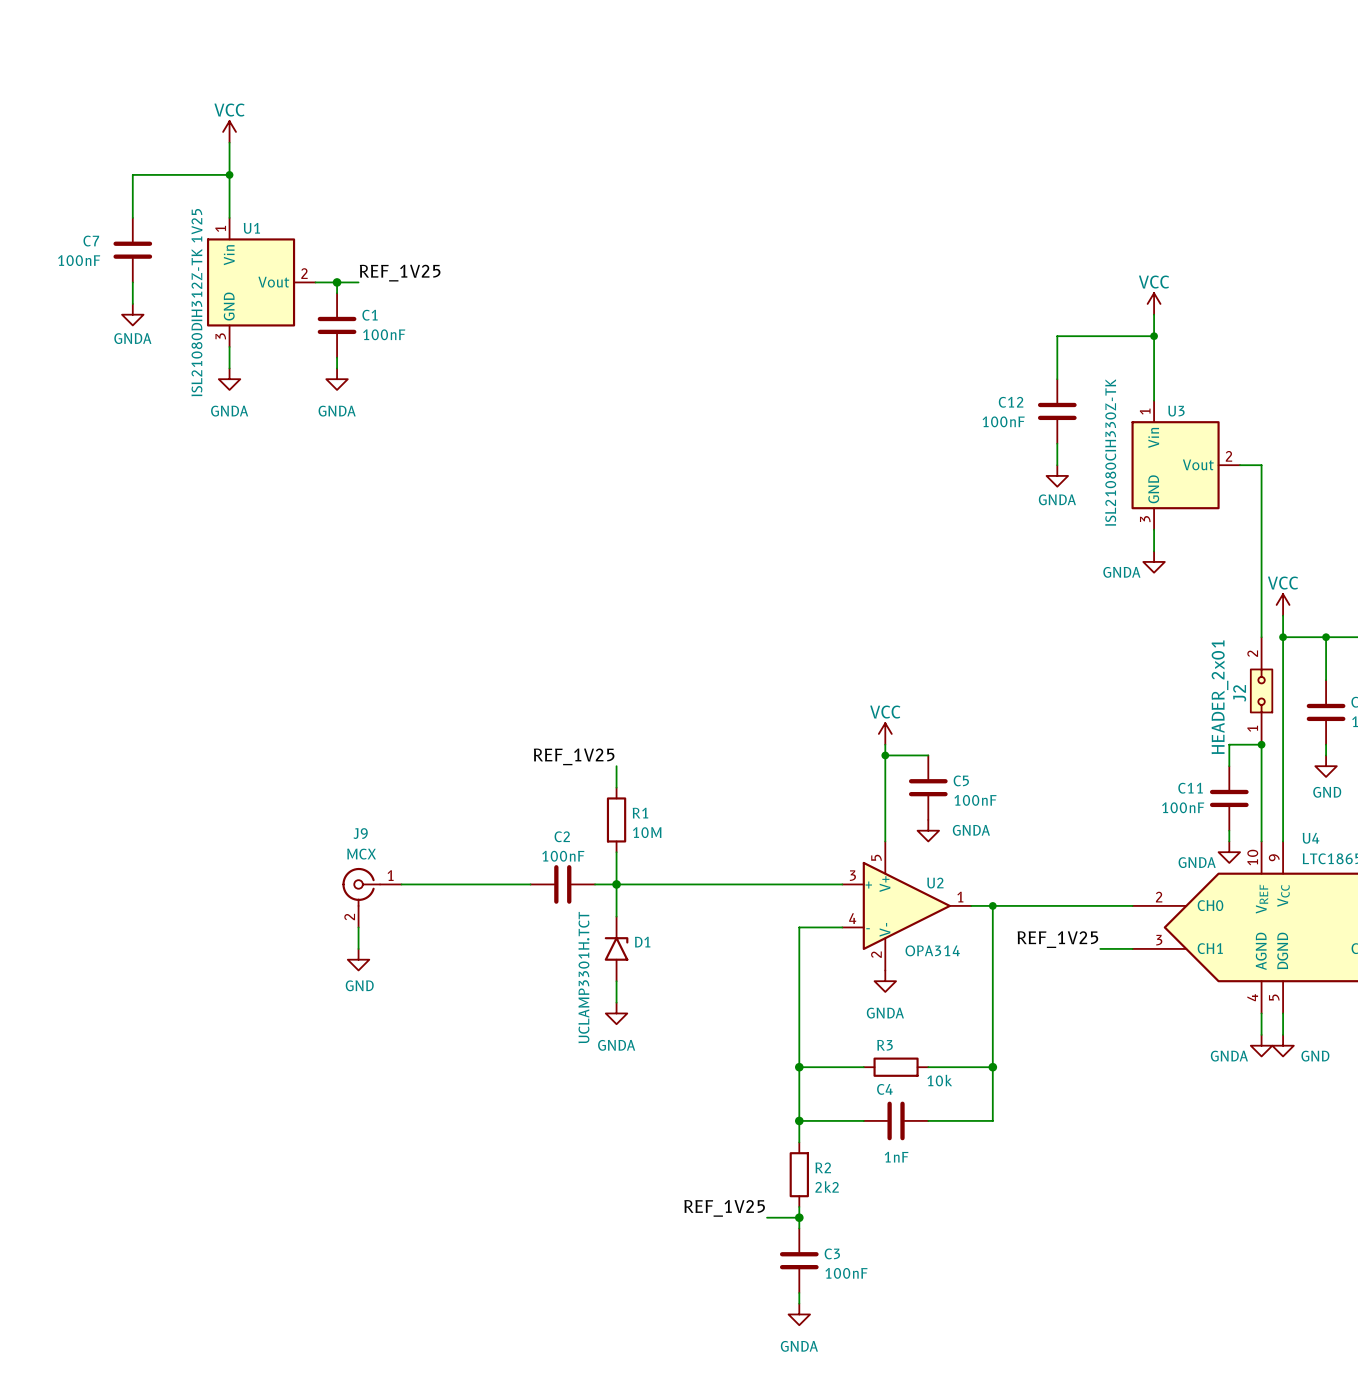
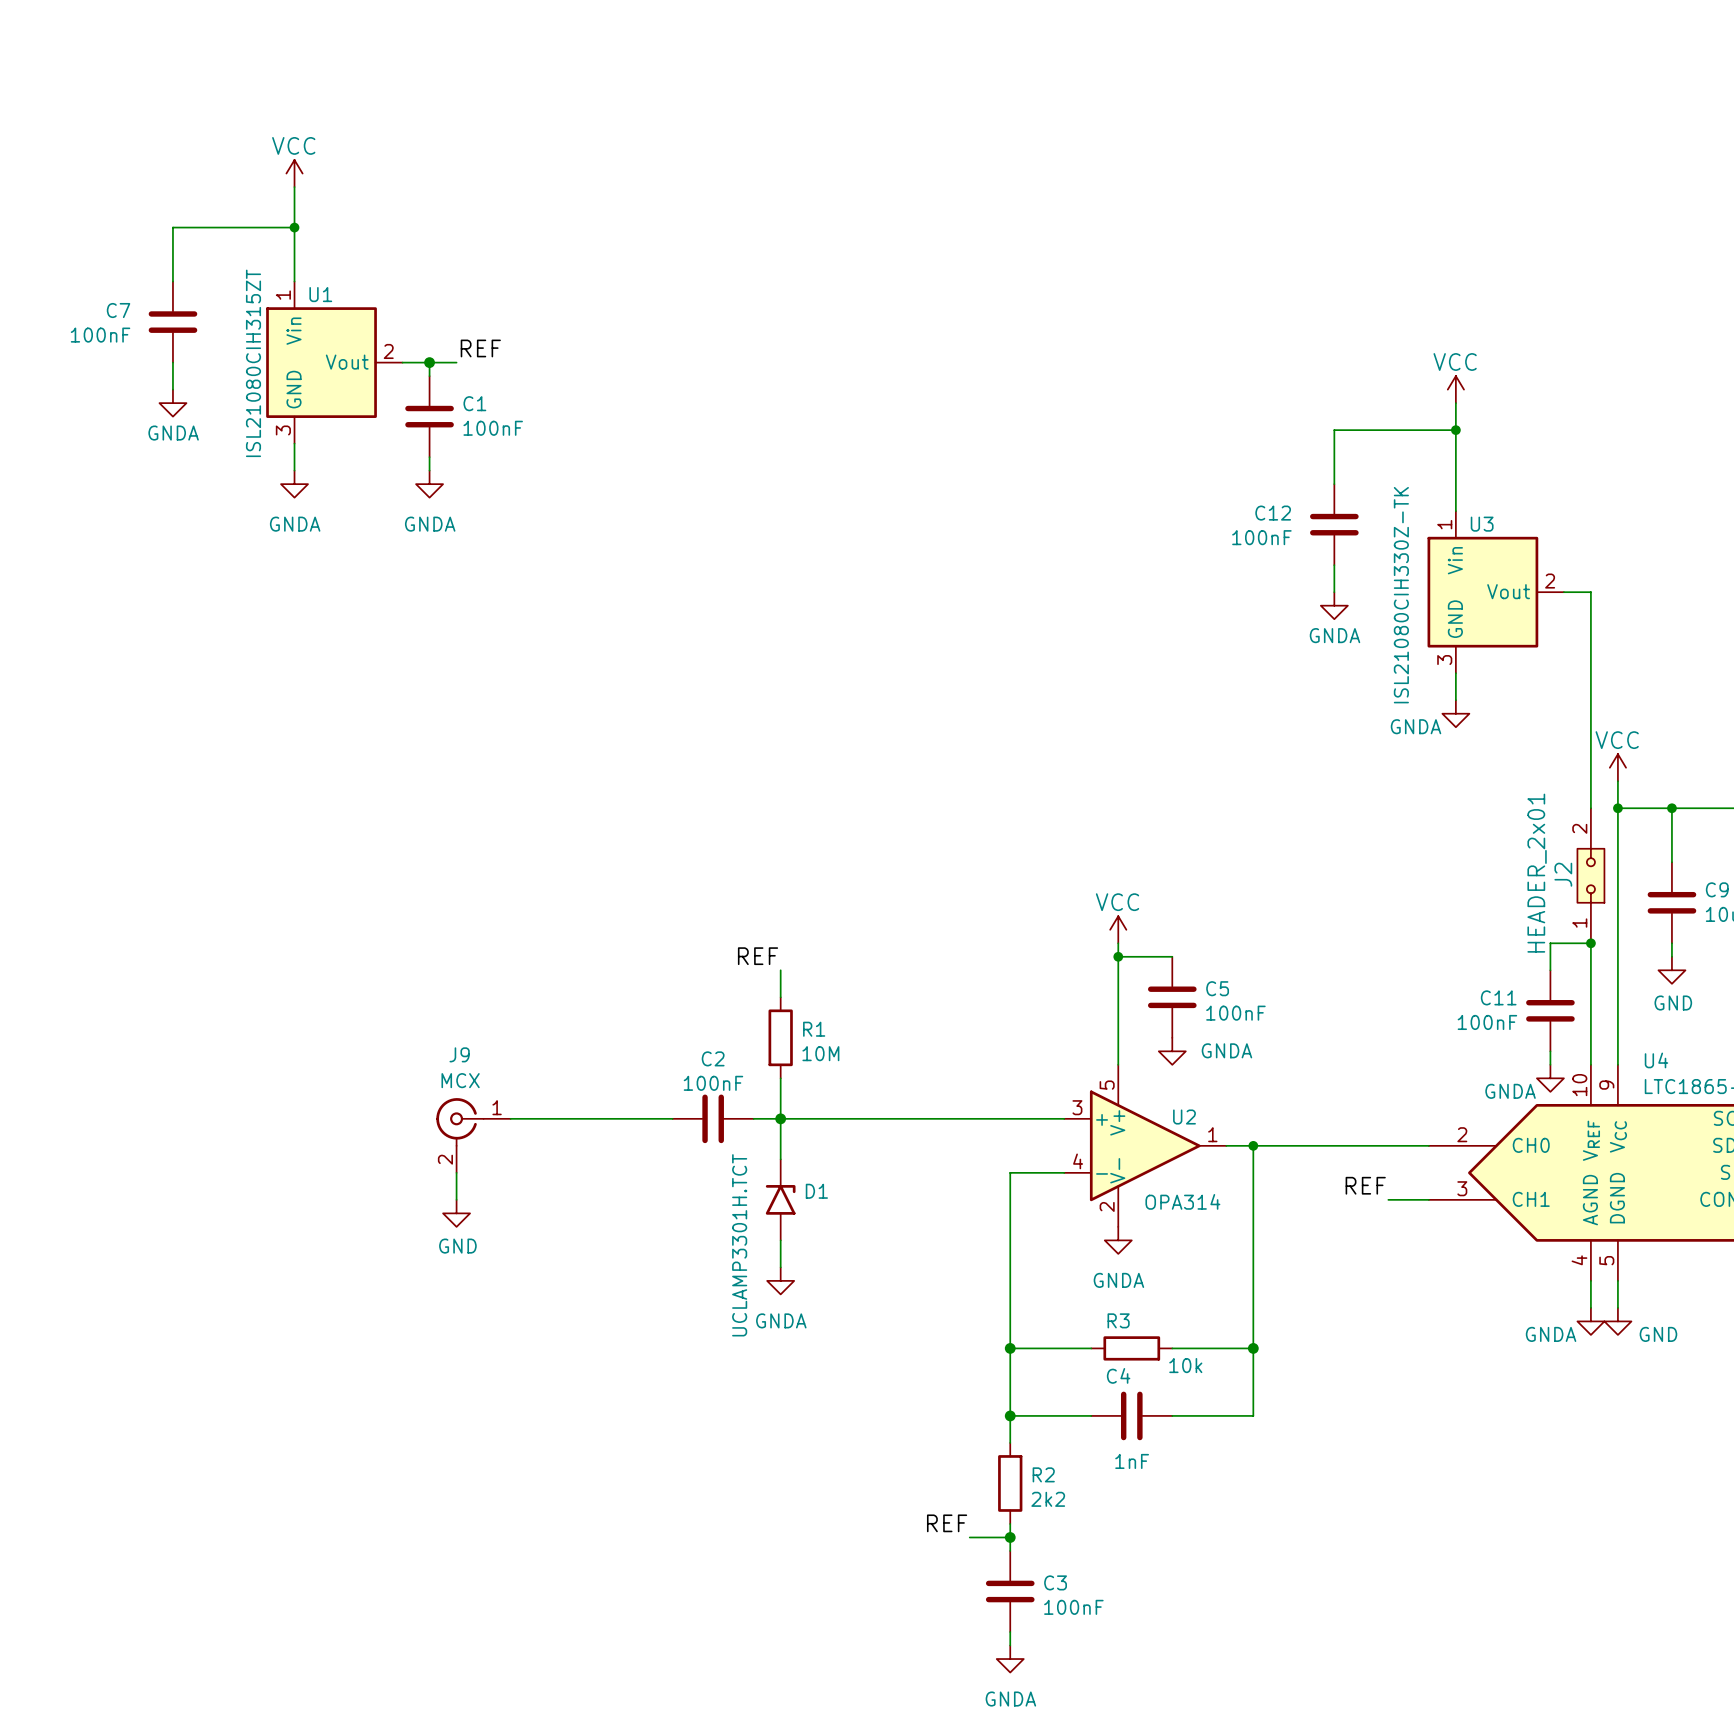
label: REF_1V25 (400, 273) -> REF (480, 348)
U1 value: ISL21080DIH312Z-TK 1V25 (196, 302) -> ISL21080CIH315ZT (253, 363)
label: REF_1V25 (574, 756) -> REF (758, 956)
label: REF_1V25 (1057, 939) -> REF (1365, 1185)
label: REF_1V25 (724, 1208) -> REF (947, 1523)

